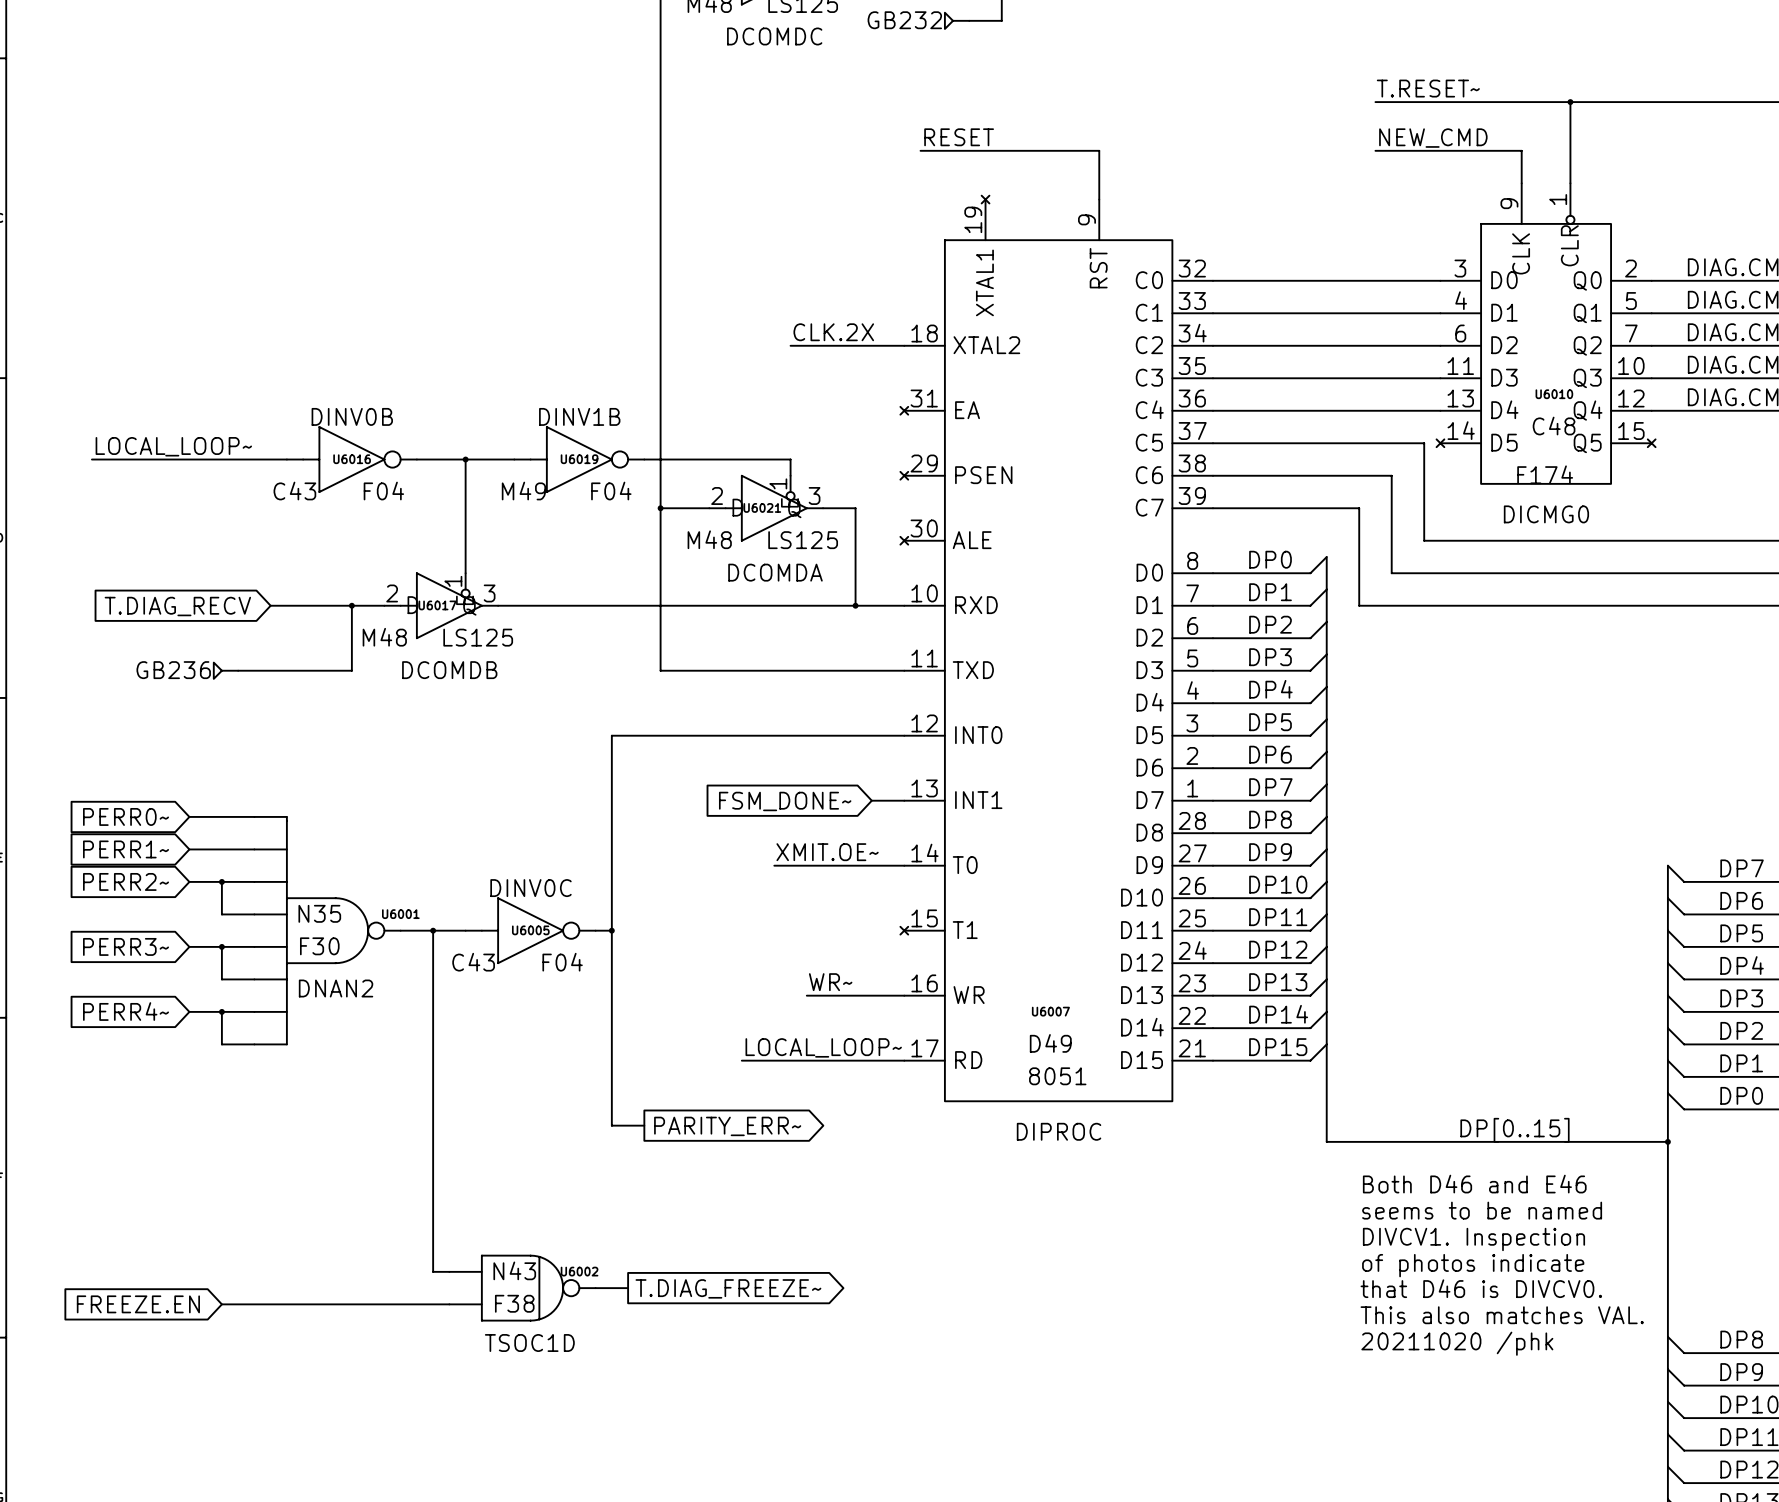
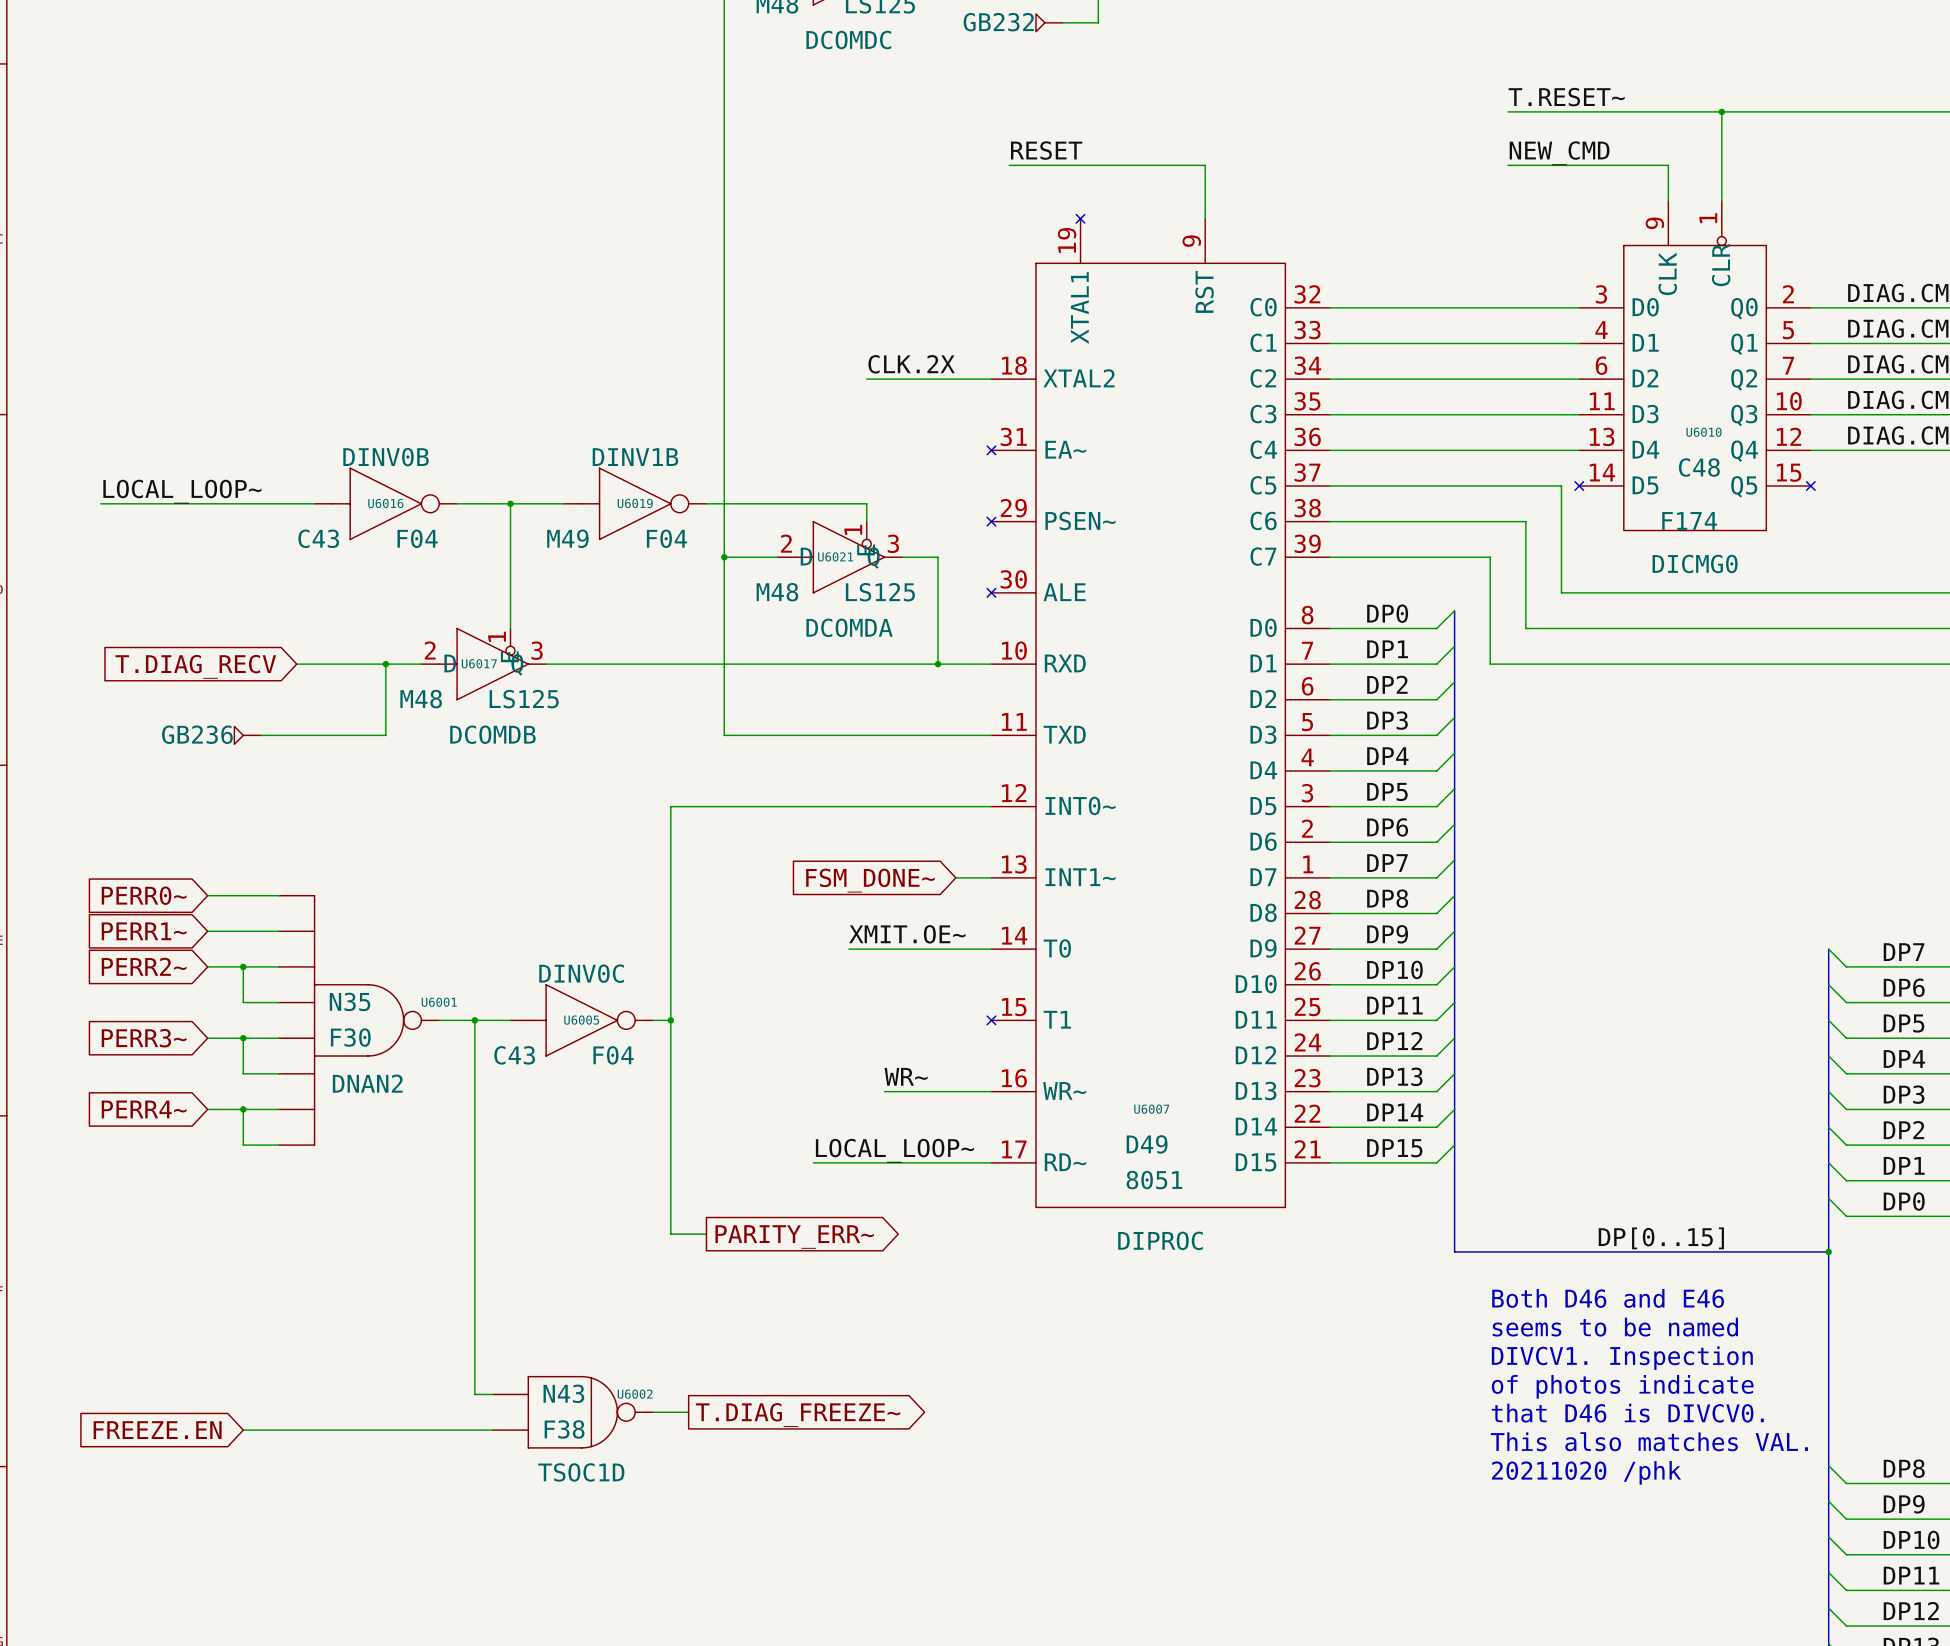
U6007 pin name: EA (967, 410) -> EA~ (1065, 449)
U6007 pin name: PSEN (983, 475) -> PSEN~ (1080, 520)
U6007 pin name: INT0 (978, 735) -> INT0~ (1080, 805)
U6007 pin name: INT1 (978, 800) -> INT1~ (1080, 877)
U6007 pin name: WR (969, 995) -> WR~ (1064, 1090)
U6007 pin name: RD (968, 1060) -> RD~ (1065, 1162)

